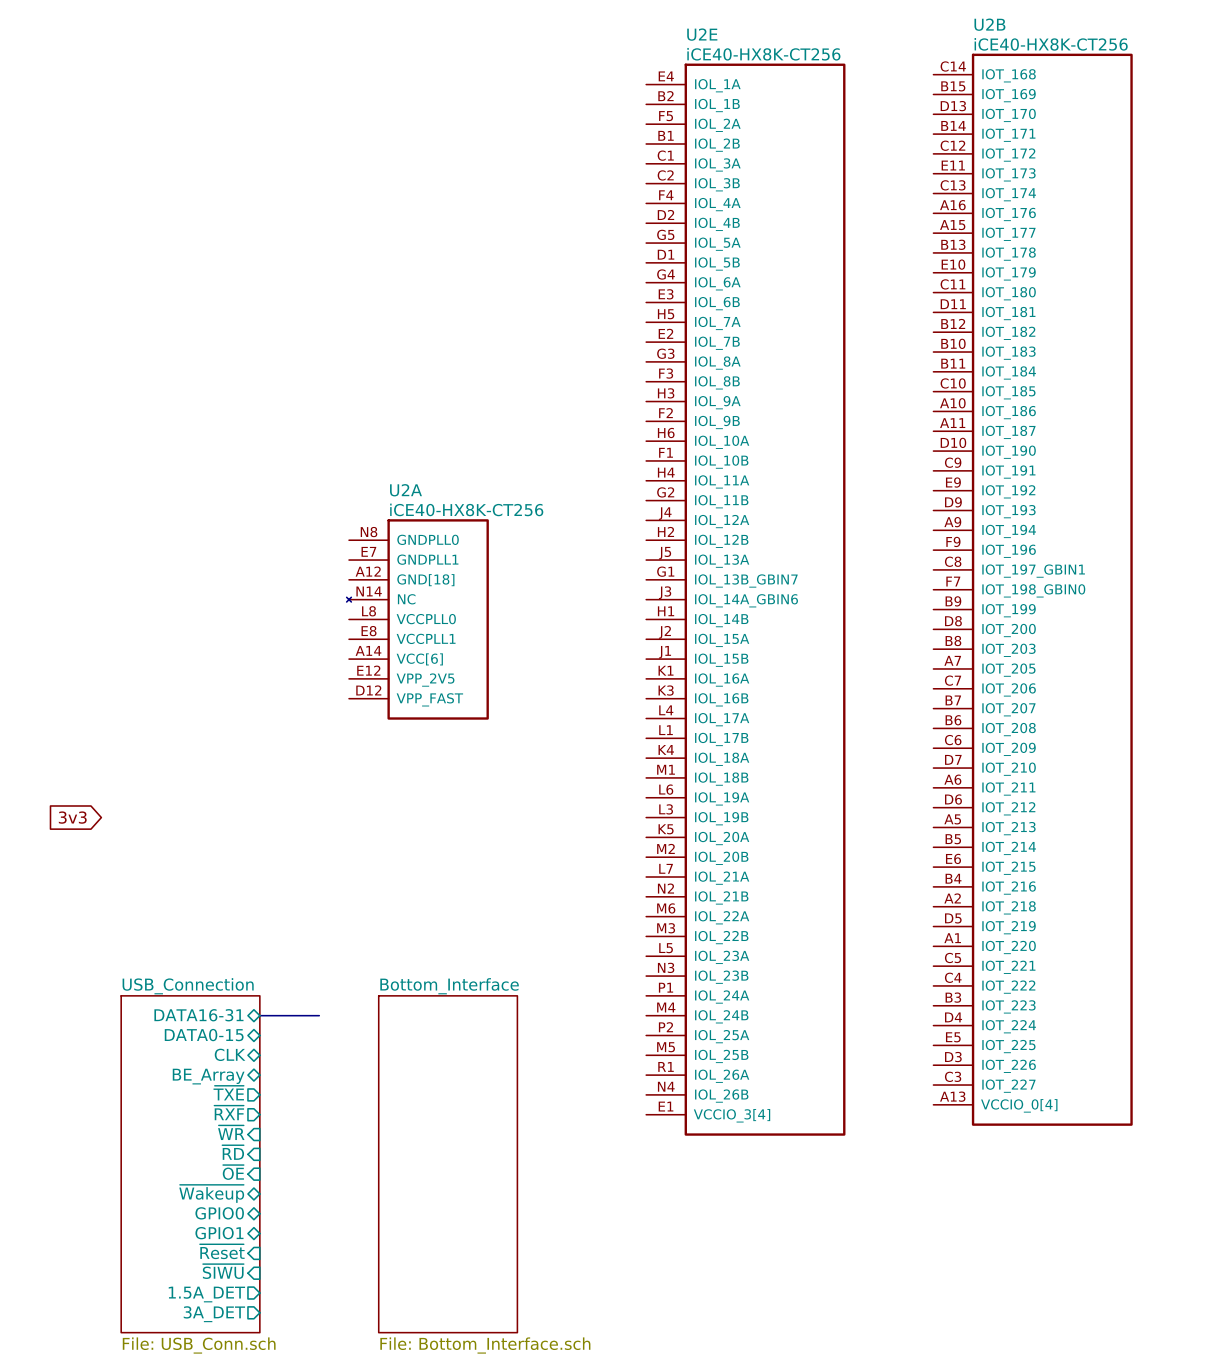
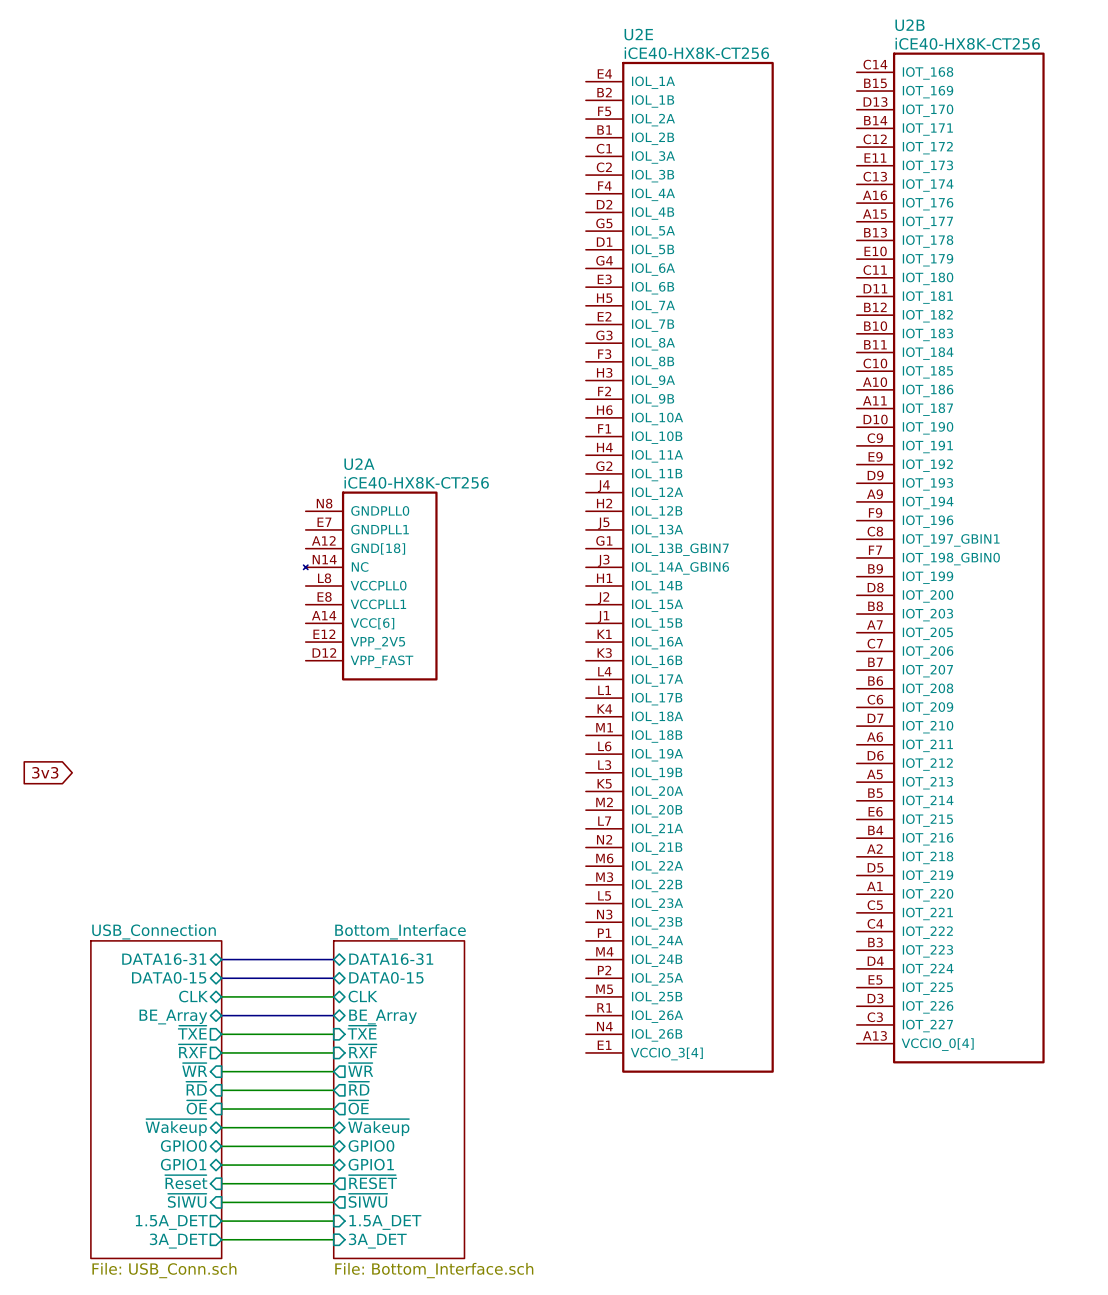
bus: none -> (277, 959) (333, 959)
sheet pin: none -> DATA16-31 (391, 959)
bus: none -> (221, 978) (333, 978)
sheet pin: none -> DATA0-15 (386, 977)
sheet pin: none -> CLK (363, 996)
wire: none -> (221, 996) (333, 996)
bus: none -> (221, 1015) (333, 1015)
sheet pin: none -> BE_Array (383, 1017)
sheet pin: none -> ~{TXE} (362, 1032)
wire: none -> (221, 1034) (333, 1034)
sheet pin: none -> ~{RXF} (362, 1051)
wire: none -> (221, 1052) (333, 1052)
sheet pin: none -> ~{WR} (360, 1069)
wire: none -> (221, 1071) (333, 1071)
sheet pin: none -> ~{RD} (359, 1088)
wire: none -> (221, 1090) (333, 1090)
sheet pin: none -> ~{OE} (358, 1107)
wire: none -> (221, 1109) (333, 1109)
wire: none -> (221, 1127) (333, 1127)
sheet pin: none -> ~{Wakeup} (378, 1127)
wire: none -> (221, 1146) (333, 1146)
sheet pin: none -> GPIO0 (371, 1145)
wire: none -> (221, 1165) (333, 1165)
sheet pin: none -> GPIO1 (371, 1164)
sheet pin: none -> ~{RESET} (372, 1182)
wire: none -> (221, 1183) (333, 1183)
sheet pin: none -> ~{SIWU} (368, 1200)
wire: none -> (221, 1202) (333, 1202)
wire: none -> (221, 1221) (333, 1221)
sheet pin: none -> 1.5A_DET (385, 1222)
wire: none -> (221, 1239) (333, 1239)
sheet pin: none -> 3A_DET (377, 1241)

